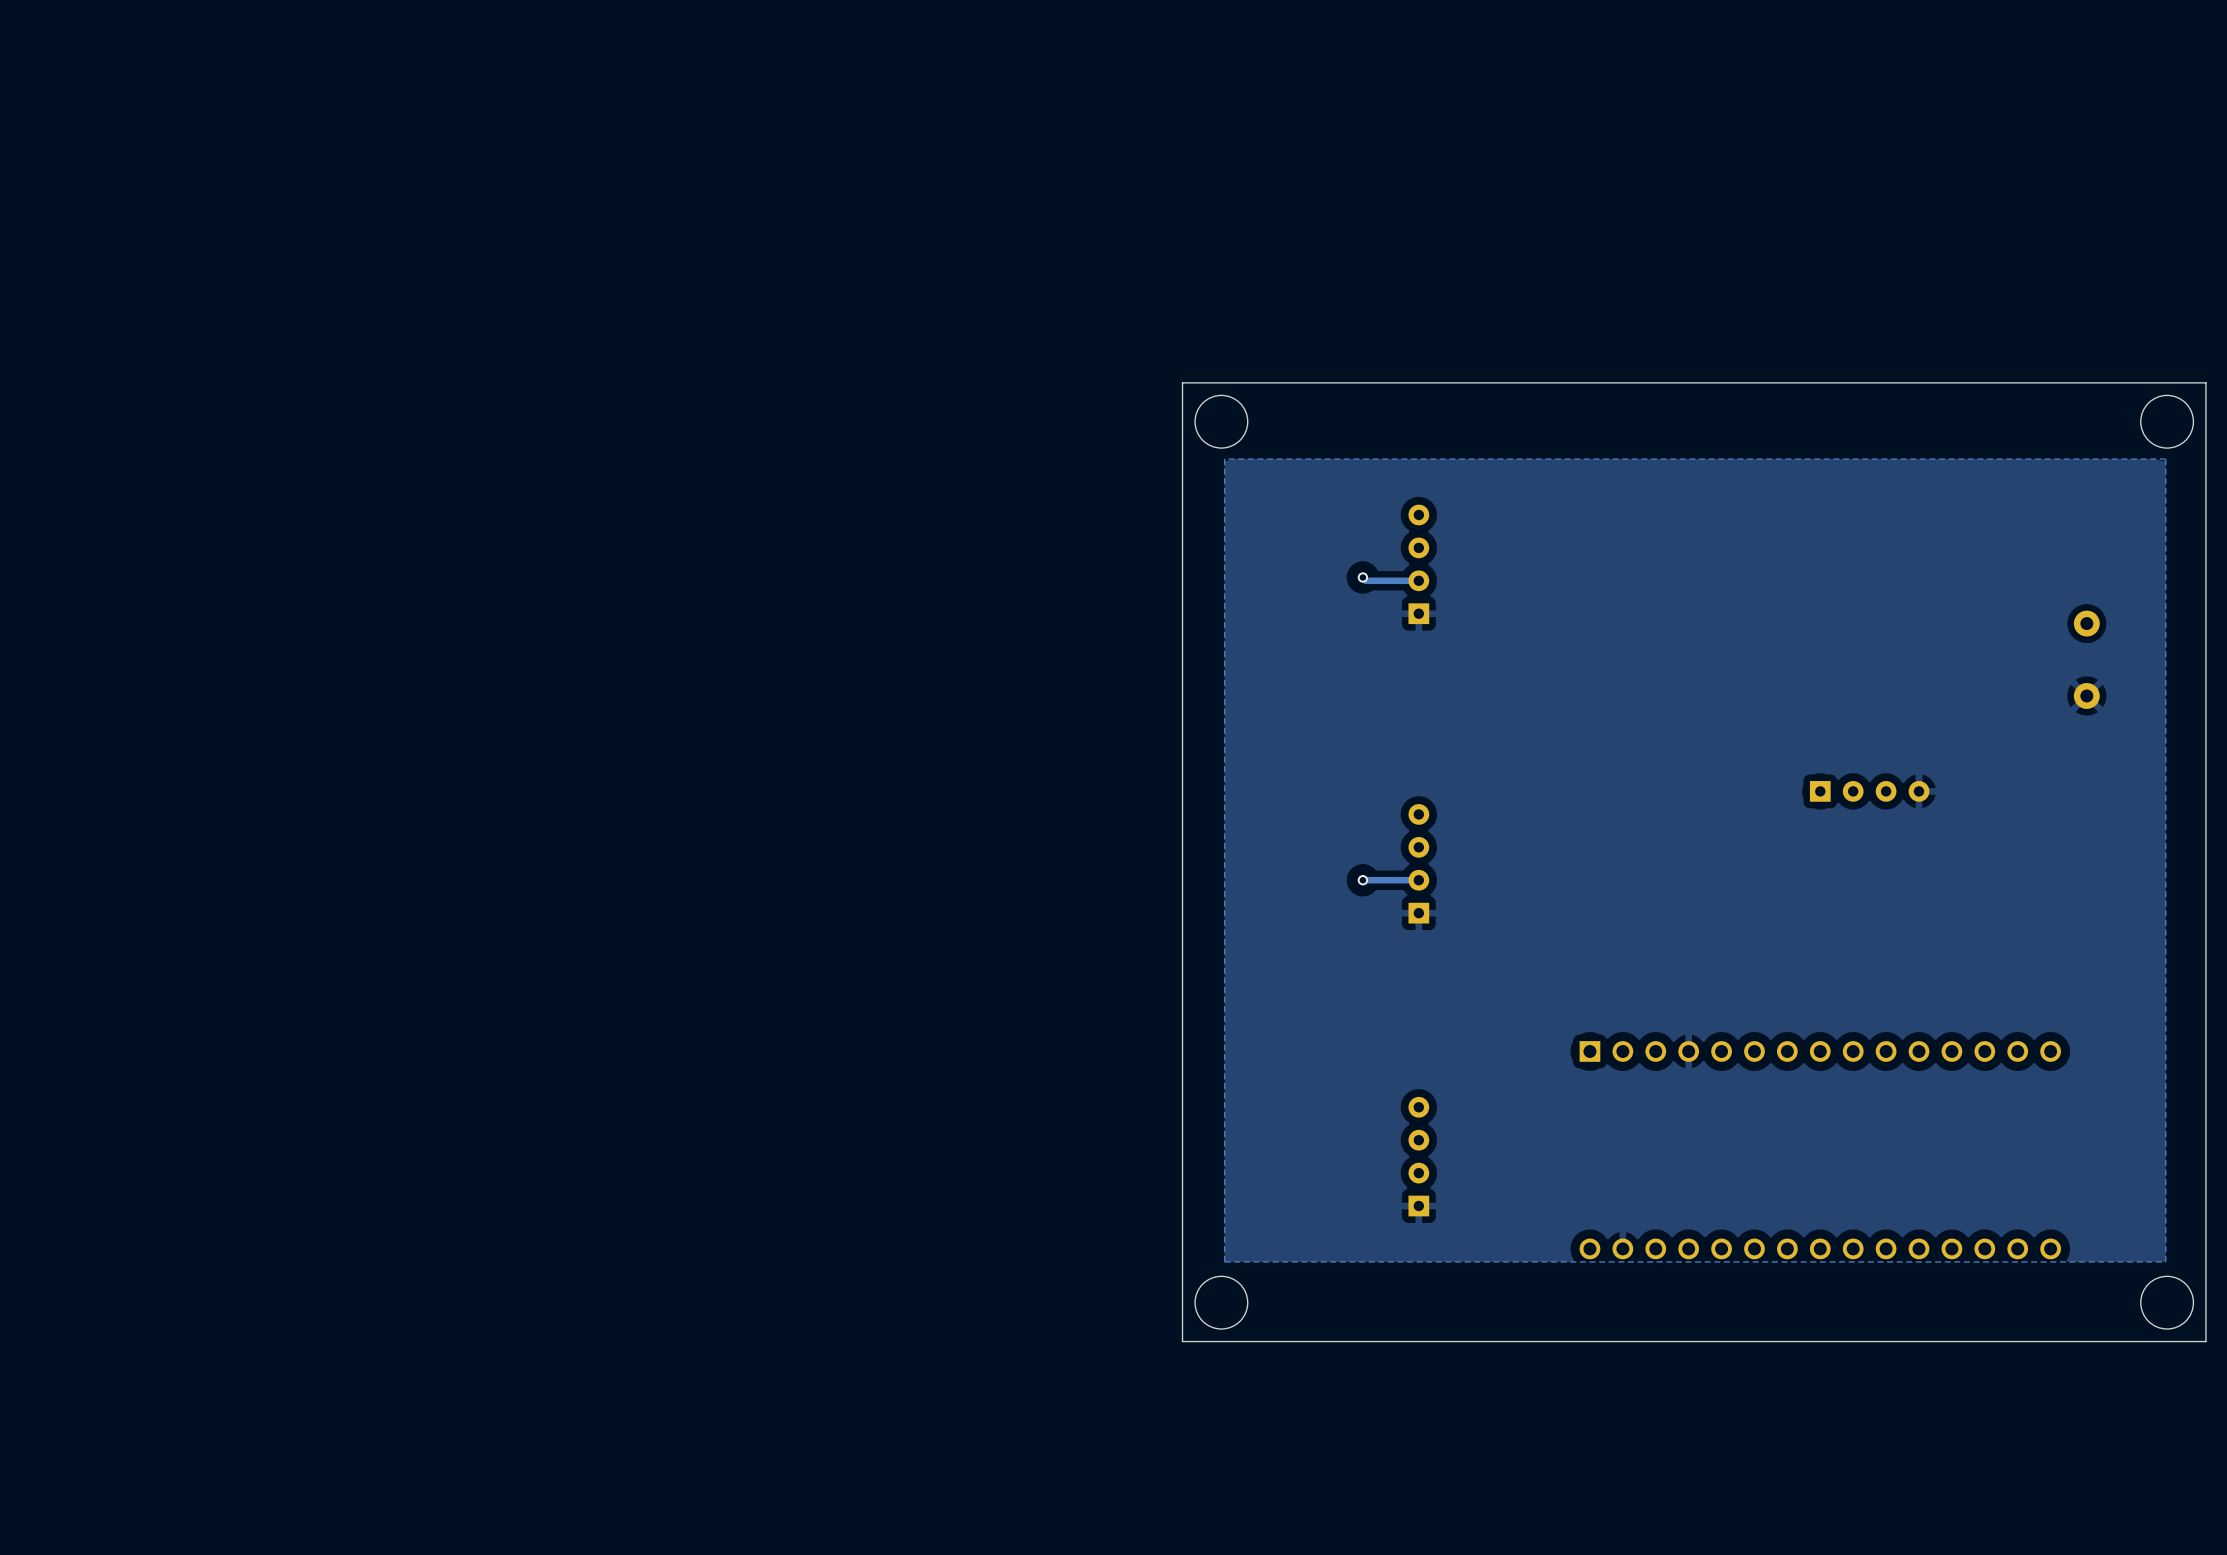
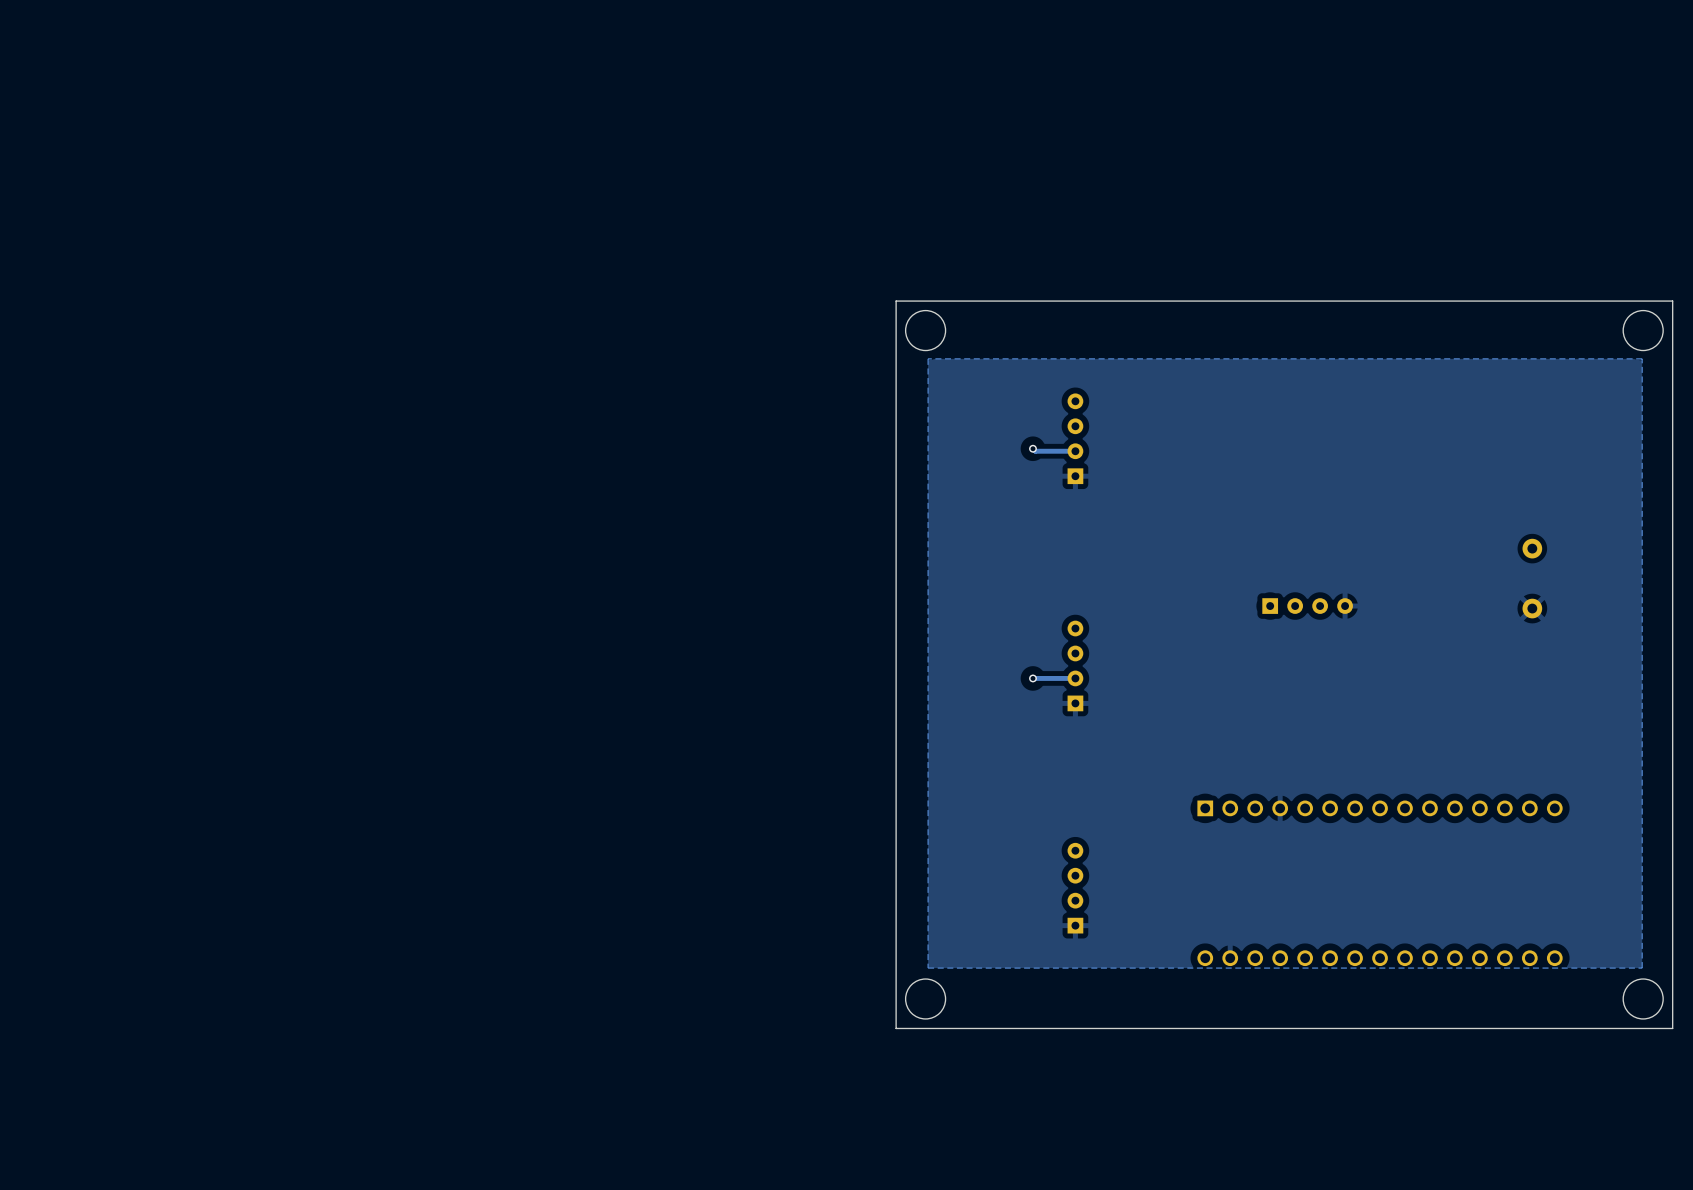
part: (2086, 623) -> none
part: (2086, 695) -> none
part: none -> (1532, 548)
part: none -> (1532, 608)
part position: (1869, 791) -> (1307, 606)

